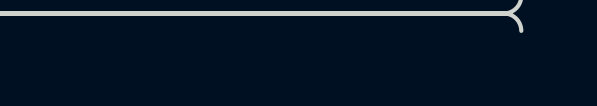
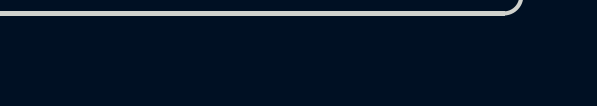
board edge: (503, 13) (516, 18) (521, 30) -> none

